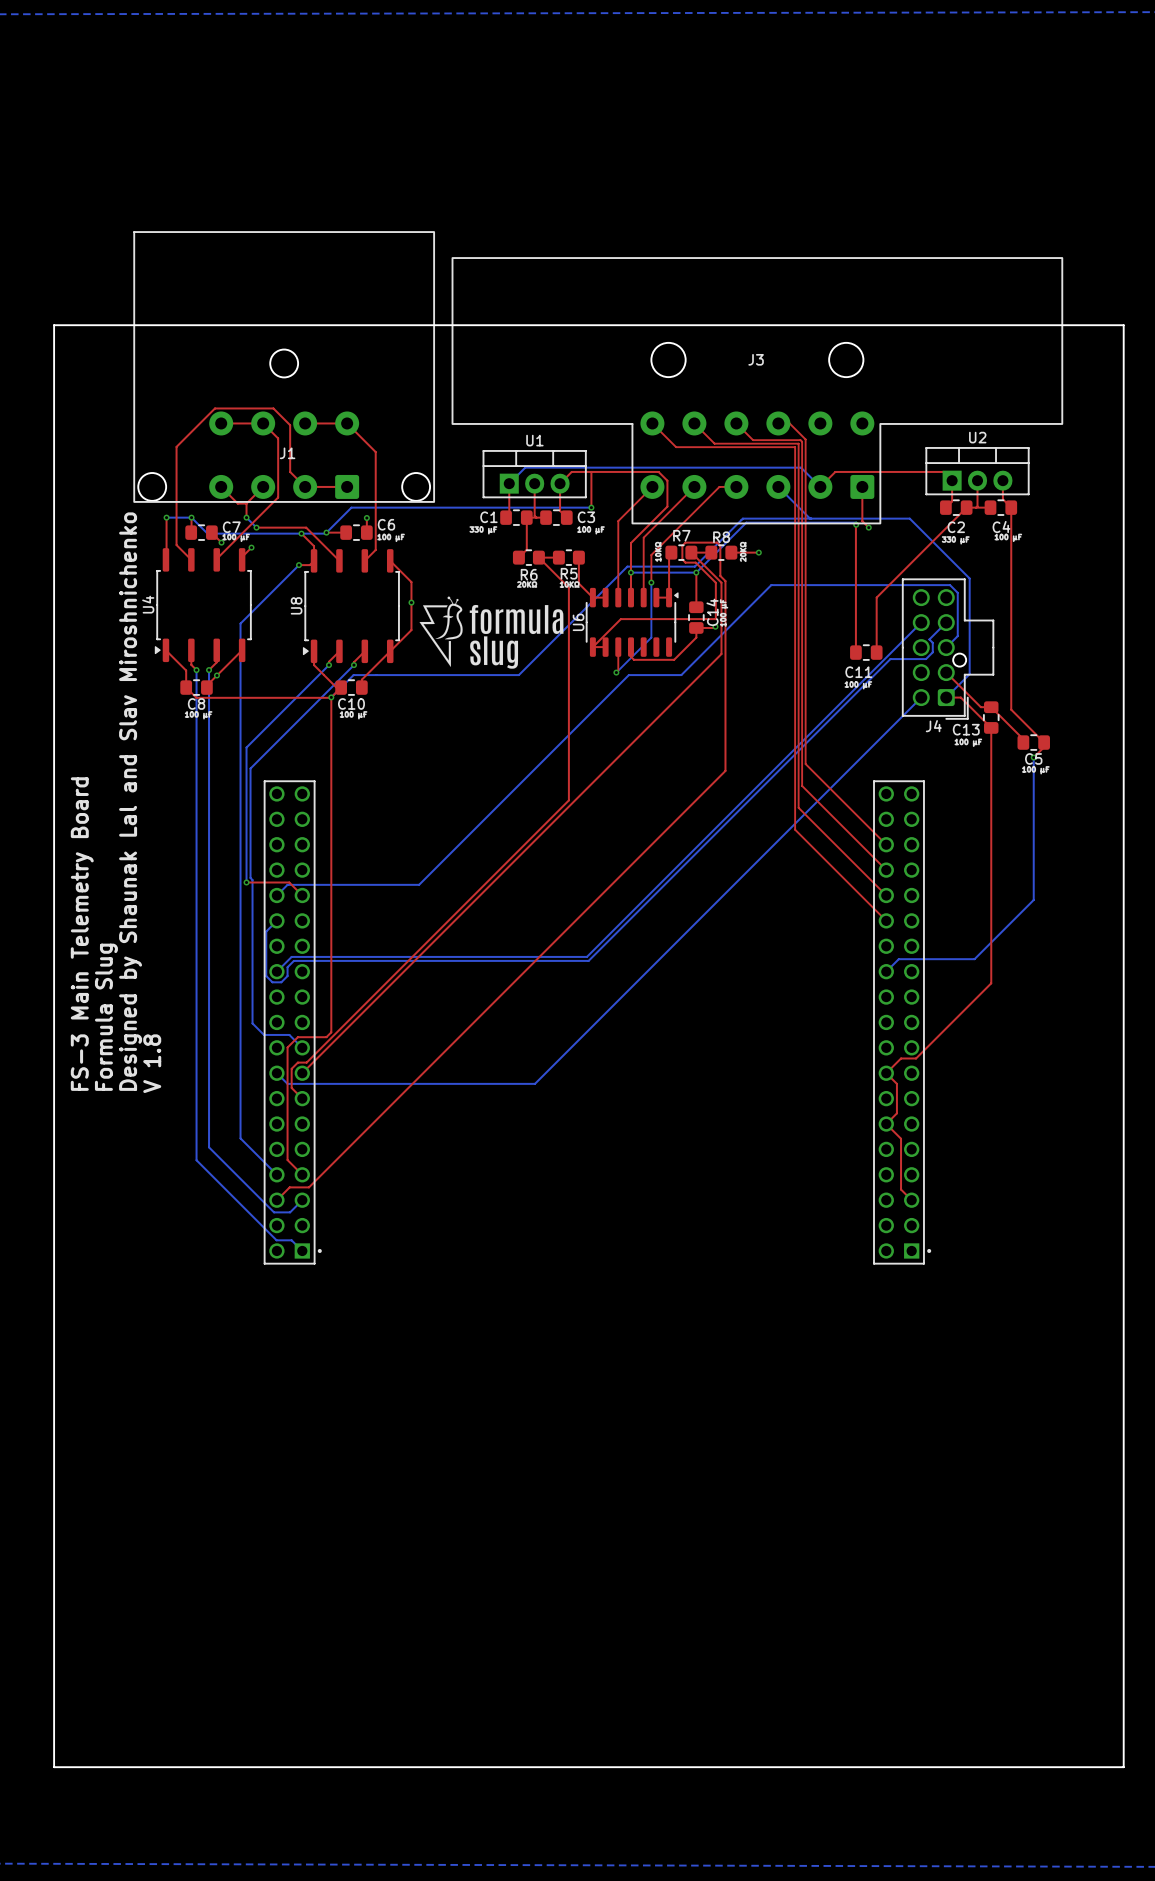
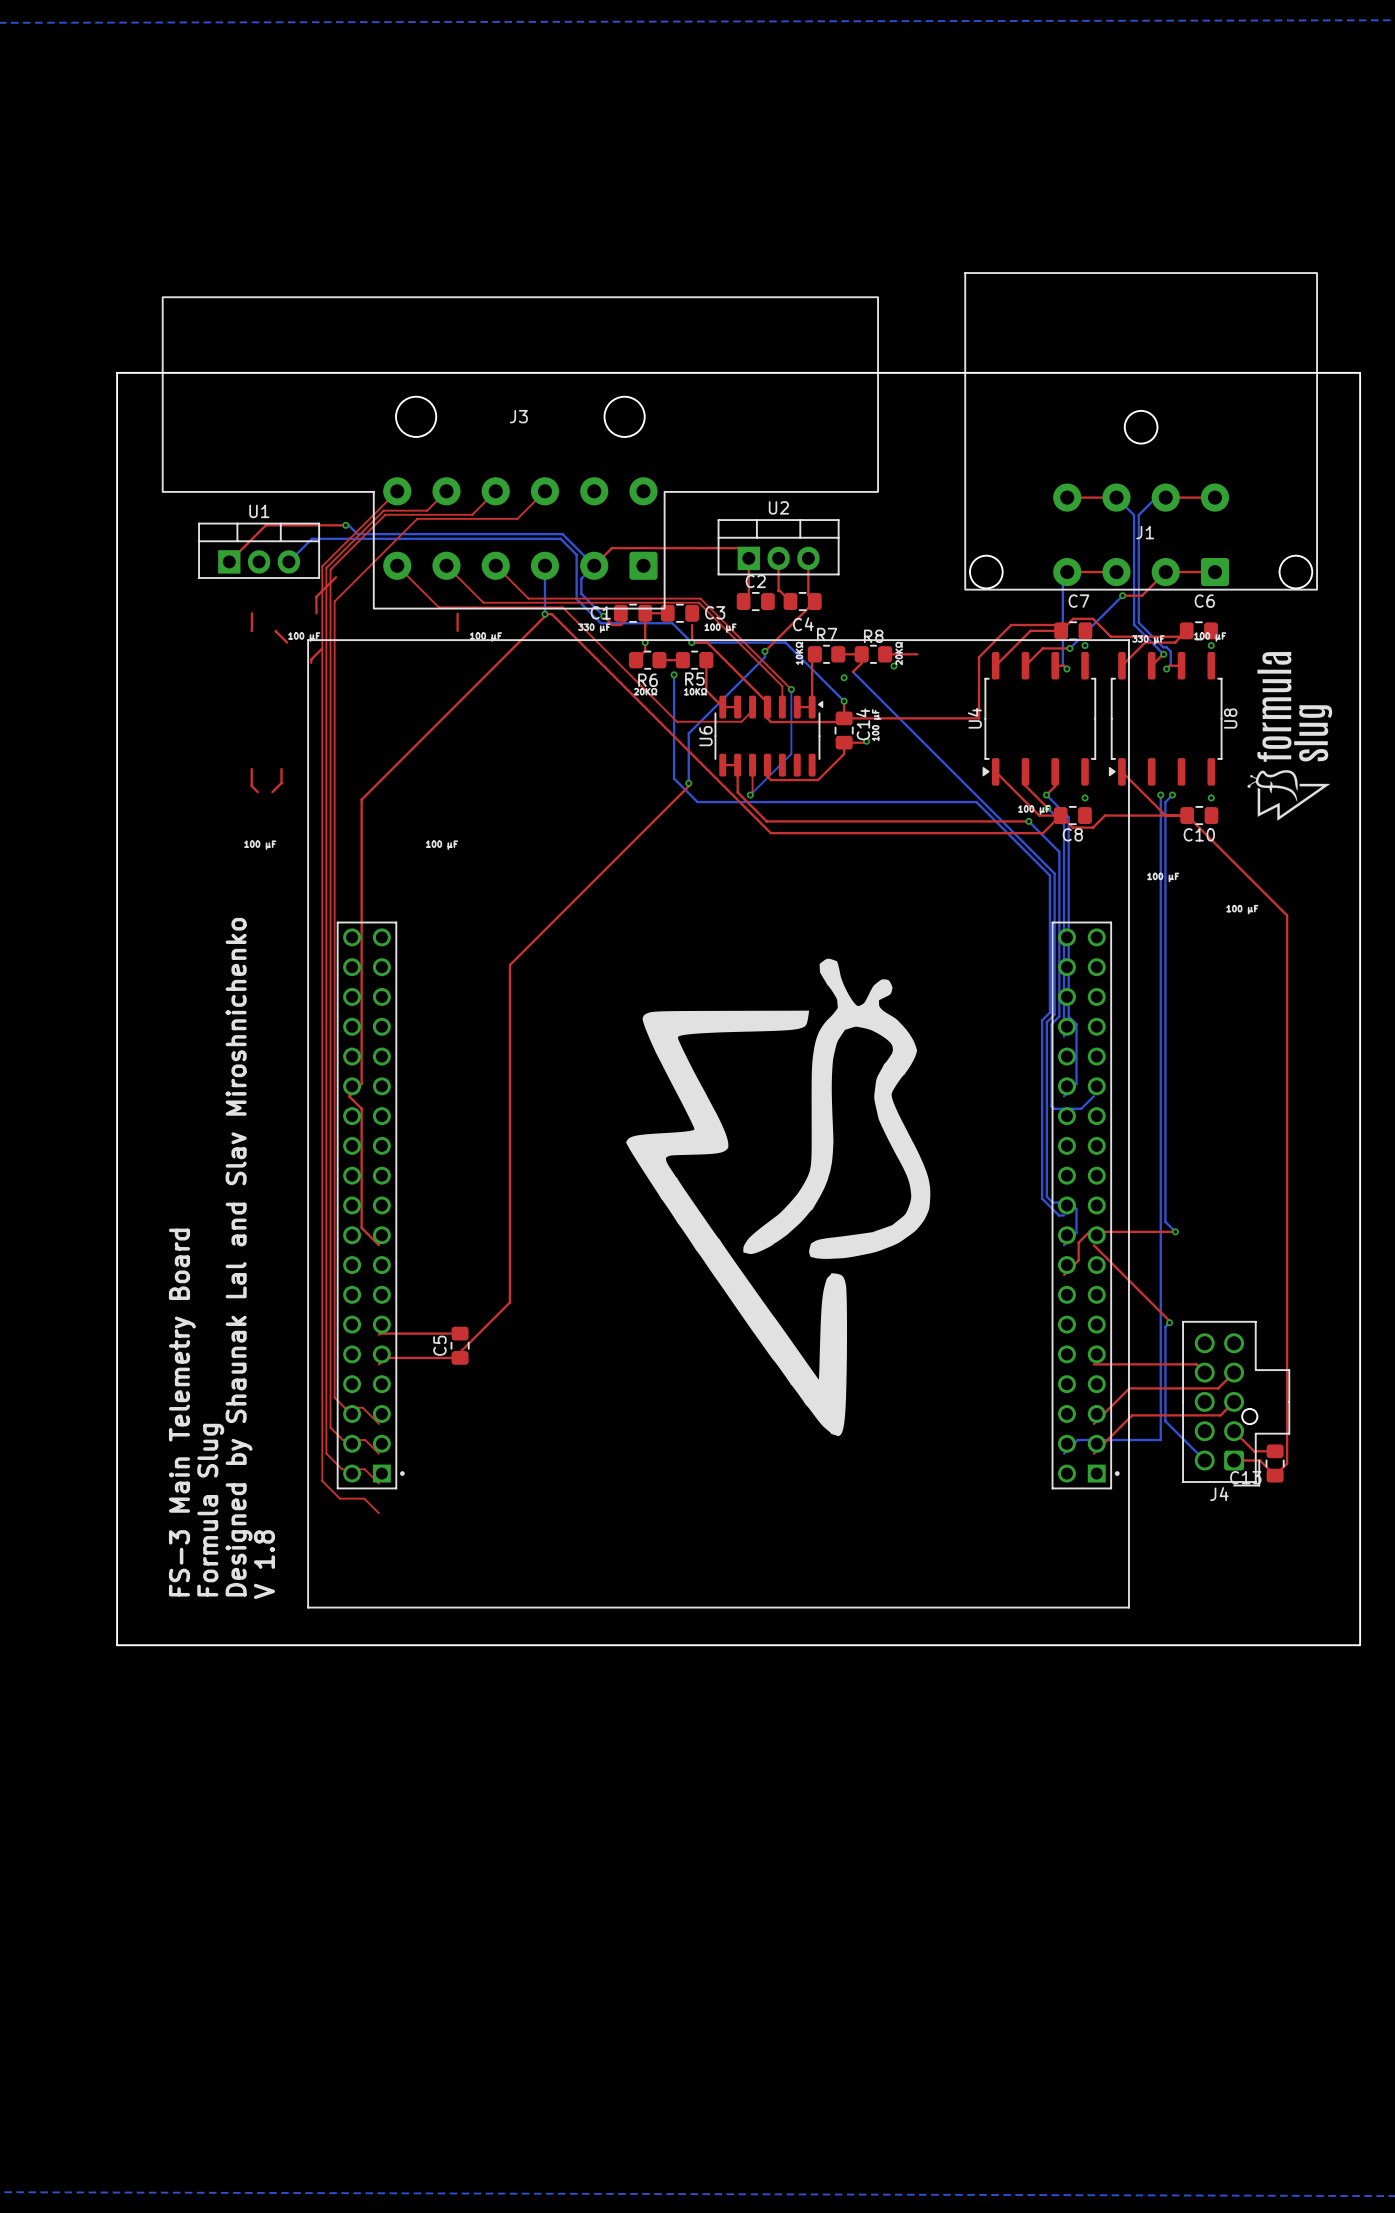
board edge: (54, 325) (1123, 325) (1123, 1767) (54, 1767) (54, 325) -> (117, 372) (117, 1645) (1360, 1645) (1360, 372) (117, 372)
J1 position: (284, 366) -> (1141, 431)
J3 position: (757, 390) -> (520, 452)
top track: none -> (397, 491) (322, 566) (322, 1481) (339, 1498) (364, 1498) (378, 1513)
top track: none -> (446, 491) (427, 510) (383, 510) (326, 567) (326, 1453) (342, 1469) (364, 1469) (378, 1483)
top track: none -> (495, 491) (472, 514) (385, 514) (330, 569) (330, 1427) (342, 1440) (365, 1440) (378, 1453)
top track: none -> (544, 491) (517, 518) (417, 518) (334, 601) (334, 1397) (344, 1407) (362, 1407) (378, 1423)
top track: none -> (1067, 497) (1116, 497)
bottom track: none -> (1116, 497) (1134, 515) (1134, 624) (1163, 654)
top track: none -> (1165, 497) (1215, 497)
bottom track: none -> (1165, 497) (1156, 497) (1138, 515) (1138, 622) (1163, 647) (1166, 647) (1170, 651) (1170, 664) (1166, 668)
top track: (221, 423) (263, 423) (278, 438) (278, 497) (216, 559) -> none
top track: (305, 423) (347, 423) (375, 452) (375, 549) (364, 560) -> none
top track: (652, 423) (676, 447) (795, 447) (795, 829) (886, 920) -> none
top track: (694, 423) (714, 443) (798, 443) (798, 807) (886, 895) -> none
top track: (736, 423) (753, 440) (800, 440) (802, 441) (802, 785) (886, 870) -> none
top track: (778, 423) (789, 423) (805, 439) (805, 764) (886, 844) -> none
top track: none -> (345, 525) (265, 525) (229, 561)
bottom track: none -> (345, 525) (348, 525) (357, 534) (562, 534) (594, 565) (581, 578) (581, 593) (603, 616)
via: none -> (345, 525)
top track: none -> (778, 558) (778, 590) (790, 601)
top track: none -> (808, 558) (808, 595) (814, 601) (764, 651)
top track: (591, 471) (591, 507) -> none
U2 position: (977, 471) -> (778, 547)
bottom track: none -> (288, 561) (311, 538) (560, 538) (576, 554) (576, 599) (600, 623) (672, 623) (691, 642) (785, 642) (844, 701)
U1 position: (534, 474) -> (259, 550)
bottom track: none -> (544, 565) (544, 614)
top track: none -> (594, 565) (611, 548) (738, 548) (748, 558) (748, 596) (743, 601)
top track: (977, 480) (976, 507) -> none
top track: (1002, 480) (1002, 499) (1011, 507) (1011, 709) (1044, 742) (1044, 747) (1033, 757) -> none
top track: none -> (1067, 572) (1116, 572)
bottom track: none -> (1067, 572) (1062, 576) (1062, 664) (1066, 668)
top track: none -> (1215, 572) (1165, 572) (1142, 595) (1122, 595)
top track: (509, 483) (509, 514) (506, 517) -> none
bottom track: (509, 483) (525, 467) (801, 467) (820, 486) -> none
top track: (534, 483) (534, 515) (536, 517) -> none
top track: (221, 486) (237, 503) (246, 503) -> none
top track: (347, 486) (305, 486) (290, 471) (290, 425) (273, 408) (214, 408) (176, 446) (176, 545) (191, 559) -> none
top track: (652, 486) (618, 521) (618, 597) -> (397, 565) (438, 607) (562, 607) (677, 721) (741, 721) (752, 710) (752, 707)
top track: (694, 486) (643, 537) (643, 579) -> (446, 565) (483, 602) (698, 602) (782, 686)
top track: (736, 486) (719, 486) (651, 555) (651, 582) -> (495, 565) (528, 598) (700, 598) (791, 689)
bottom track: (774, 486) (778, 486) (810, 518) -> none
top track: (820, 486) (835, 471) (943, 471) (952, 480) (952, 501) (945, 507) -> none
top track: (862, 486) (862, 521) (868, 527) -> none
bottom track: none -> (1122, 595) (1069, 648)
via: none -> (1122, 595)
bottom track: (591, 507) (351, 507) (325, 533) (207, 533) (191, 517) (166, 517) -> none
via: (591, 507) -> none
C2 position: (956, 507) -> (755, 601)
top track: (990, 507) (966, 507) (876, 597) (876, 652) -> none
C4 position: (1000, 507) -> (802, 601)
top track: (166, 517) (166, 554) -> none
via: (166, 517) -> none
via: (191, 517) -> none
bottom track: (246, 517) (256, 527) -> none
via: (246, 517) -> none
top track: (566, 517) (560, 510) (560, 483) (571, 471) (658, 471) (667, 480) (667, 506) (630, 543) (630, 593) -> (692, 625) (691, 642) (707, 642) (767, 702)
via: (366, 518) -> none
via: none -> (544, 614)
top track: none -> (603, 616) (612, 625) (620, 625) (624, 621)
via: none -> (603, 616)
C6 name position: C6 (386, 524) -> C6 (1204, 601)
top track: (856, 524) (855, 652) -> none
bottom track: (856, 524) (856, 522) (746, 522) (696, 572) (630, 572) -> none
via: (856, 524) -> none
C7 name position: C7 (231, 527) -> C7 (1078, 601)
top track: (256, 527) (306, 527) (339, 560) -> none
via: (256, 527) -> none
via: (868, 527) -> none
C2 name position: C2 (956, 527) -> C2 (755, 581)
C7 position: (201, 532) -> (1073, 630)
top track: (326, 532) (346, 532) -> none
via: (326, 532) -> none
C6 position: (356, 532) -> (1198, 630)
top track: none -> (1061, 630) (1055, 625) (1011, 625) (979, 657) (979, 718) (844, 718) (840, 722) (770, 722) (767, 718) (767, 707)
top track: none -> (1061, 630) (1073, 618) (1093, 618) (1110, 636) (1180, 636)
top track: none -> (1061, 630) (1030, 630) (995, 665)
top track: none -> (1186, 630) (1175, 642) (1145, 642) (1121, 665)
top track: (301, 533) (314, 546) (314, 560) (309, 565) (299, 565) -> none
via: (301, 533) -> none
line: none -> (308, 640) (1128, 640) (1128, 1607) (308, 1607) (308, 640)
via: (221, 542) -> none
via: none -> (645, 642)
via: none -> (691, 642)
via: none -> (1085, 645)
via: none -> (1211, 645)
via: (251, 547) -> none
top track: none -> (1069, 648) (1042, 648) (1025, 665)
via: none -> (1069, 648)
bottom track: none -> (764, 651) (764, 657) (688, 733) (688, 783)
drawing: none -> [1247, 651, 1333, 821]
top track: (691, 552) (721, 582) (721, 654) (302, 1073) -> none
top track: none -> (861, 654) (861, 663) (852, 671)
via position: (758, 552) -> (893, 666)
top track: none -> (1163, 654) (1151, 665)
via: none -> (1163, 654)
top track: (538, 557) (568, 587) (568, 800) (306, 1062) (297, 1062) (291, 1068) (291, 1087) (302, 1098) -> none
top track: (390, 560) (411, 582) (411, 630) (361, 679) (361, 687) -> none
top track: none -> (1055, 665) (1063, 665) (1066, 668)
top track: none -> (1181, 665) (1169, 665) (1166, 668)
bottom track: (299, 565) (240, 623) (240, 1138) (276, 1174) -> none
via: (299, 565) -> none
via: none -> (1066, 668)
via: none -> (1166, 668)
bottom track: none -> (852, 671) (1054, 873) (1054, 1014) (1046, 1022) (1046, 1196) (1052, 1202) (1069, 1202) (1076, 1209) (1076, 1232) (1064, 1245)
bottom track: none -> (674, 674) (674, 778) (697, 802) (976, 802) (1049, 875) (1049, 1012) (1042, 1020) (1042, 1198) (1058, 1215) (1064, 1215)
via: none -> (674, 674)
via position: (630, 572) -> (764, 651)
top track: (696, 572) (696, 592) -> none
via: none -> (844, 701)
drawing: [419, 596, 564, 669] -> none
via: (411, 602) -> none
U4 position: (203, 605) -> (1039, 718)
U8 name position: U8 (296, 605) -> U8 (1230, 718)
U8 position: (351, 606) -> (1165, 718)
bottom track: (921, 622) (586, 956) (291, 956) (276, 971) -> none
bottom track: (946, 622) (929, 639) (932, 642) (932, 652) (926, 659) (890, 659) (588, 960) (293, 960) (287, 967) (287, 976) (281, 982) (272, 982) (266, 976) (266, 931) (276, 920) -> none
top track: (592, 647) (620, 619) (715, 619) (715, 582) (695, 562) (685, 562) (682, 559) (682, 545) (685, 542) (717, 542) (720, 545) (720, 575) (725, 581) (725, 770) (309, 1187) (289, 1187) (276, 1200) -> none
top track: none -> (737, 765) (737, 792) (766, 821) (1028, 821)
bottom track: (946, 647) (957, 636) (957, 592) (950, 585) (771, 585) (681, 675) (628, 675) (419, 884) (287, 884) (276, 895) -> none
J4 position: (948, 649) -> (1236, 1403)
top track: (165, 650) (186, 670) (186, 687) (196, 697) (330, 697) (341, 687) (336, 687) (314, 665) (314, 651) -> none
top track: (242, 650) (206, 687) -> none
top track: (339, 651) (328, 661) (328, 665) -> none
top track: (364, 651) (353, 662) (353, 665) -> none
top track: none -> (995, 771) (1039, 815) (1060, 815)
top track: none -> (1025, 771) (1025, 785) (1047, 808)
C11: (866, 652) -> none
top track: none -> (1055, 771) (1055, 786) (1046, 795)
top track: none -> (1121, 771) (1165, 815)
top track: none -> (688, 783) (688, 786) (509, 965) (509, 1302) (460, 1352) (460, 1357) (385, 1357) (378, 1364)
via: none -> (688, 783)
bottom track: (328, 665) (246, 747) (246, 882) -> none
via: (328, 665) -> none
bottom track: (353, 665) (250, 768) (252, 1023) (264, 1034) (289, 1034) (302, 1047) -> none
via: (353, 665) -> none
bottom track: (196, 670) (196, 1160) (276, 1240) (291, 1240) (302, 1250) -> none
via: (196, 670) -> none
bottom track: (209, 670) (209, 1147) (274, 1212) (290, 1212) (302, 1200) -> none
via: (209, 670) -> none
bottom track: none -> (1046, 795) (1068, 817) (1068, 1016) (1076, 1024) (1076, 1083) (1064, 1096)
via: none -> (1046, 795)
top track: (946, 672) (980, 707) (991, 707) (1023, 739) (1023, 742) -> none
bottom track: none -> (1160, 795) (1160, 1440) (1077, 1440) (1064, 1453)
via: none -> (1160, 795)
bottom track: none -> (1172, 795) (1165, 802) (1165, 1221) (1175, 1231)
via: none -> (1172, 795)
via: (216, 675) -> none
via: none -> (1085, 797)
via: none -> (1211, 797)
bottom track: none -> (1047, 808) (1064, 824) (1064, 1036)
via: none -> (1047, 808)
C8 position: (196, 687) -> (1072, 815)
C10 position: (351, 687) -> (1199, 815)
top track: none -> (1060, 815) (1072, 827) (1093, 827) (1105, 815) (1187, 815) (1287, 915) (1287, 1463) (1275, 1475) (1260, 1460) (1234, 1460)
top track: none -> (1060, 815) (1043, 833) (770, 833) (551, 614) (544, 614) (544, 616) (361, 799) (361, 1083) (349, 1096) (361, 1108) (361, 1227) (378, 1245)
bottom track: none -> (1028, 821) (1059, 851) (1059, 1016) (1051, 1024) (1051, 1106) (1054, 1108) (1081, 1108) (1093, 1096)
via: none -> (1028, 821)
top track: (331, 697) (331, 1032) (326, 1037) (297, 1037) (287, 1047) (287, 1160) (302, 1174) -> none
bottom track: (331, 697) (353, 675) (518, 675) (627, 566) (694, 566) (742, 518) (909, 518) (969, 578) (969, 674) (946, 697) -> none
via: (331, 697) -> none
bottom track: (921, 697) (534, 1083) (287, 1083) (276, 1073) -> none
top track: (946, 697) (960, 697) (991, 727) (991, 983) (916, 1058) (901, 1058) (886, 1073) (896, 1083) (896, 1113) (886, 1124) (901, 1138) (901, 1189) (911, 1200) -> none
C13 position: (991, 717) -> (1275, 1463)
C5 rotation: 0° (1033, 742) -> 90° clockwise (460, 1345)
C5 position: (1033, 742) -> (460, 1345)
bottom track: (1033, 757) (1033, 900) (974, 959) (898, 959) (886, 971) -> none
via: (1033, 757) -> none
text: Designed by Shaunak Lal and Slav Miroshnichenko (130, 801) -> none
drawing: none -> [626, 958, 931, 1437]
top track: (246, 882) (289, 882) (302, 895) -> none
via: (246, 882) -> none
text: FS-3 Main Telemetry Board (82, 934) -> none
text: Formula Slug (106, 1017) -> none
top track: none -> (1175, 1231) (1089, 1231) (1078, 1242) (1078, 1260) (1064, 1275)
via: none -> (1175, 1231)
top track: none -> (1093, 1245) (1169, 1322)
text: V 1.8 (152, 1063) -> none
text: none -> Designed by Shaunak Lal and Slav Miroshnichenko (239, 1257)
bottom track: none -> (1169, 1320) (1165, 1326) (1165, 1421) (1204, 1460)
via: none -> (1169, 1322)
top track: none -> (460, 1333) (378, 1334)
top track: none -> (1093, 1364) (1196, 1364) (1204, 1372)
top track: none -> (1234, 1372) (1218, 1388) (1129, 1388) (1093, 1423)
top track: none -> (1234, 1401) (1220, 1415) (1132, 1415) (1093, 1453)
text: none -> FS-3 Main Telemetry Board (182, 1412)
top track: none -> (1234, 1431) (1254, 1451) (1275, 1451)
text: none -> Formula Slug (210, 1510)
text: none -> V 1.8 (264, 1564)

